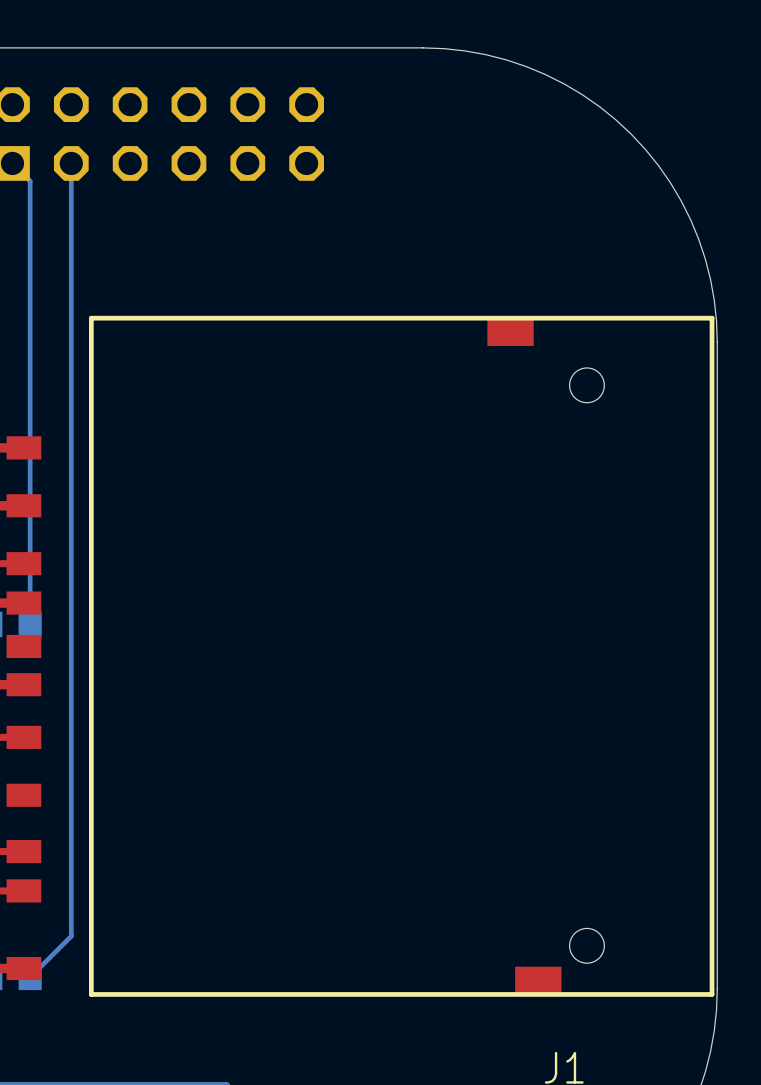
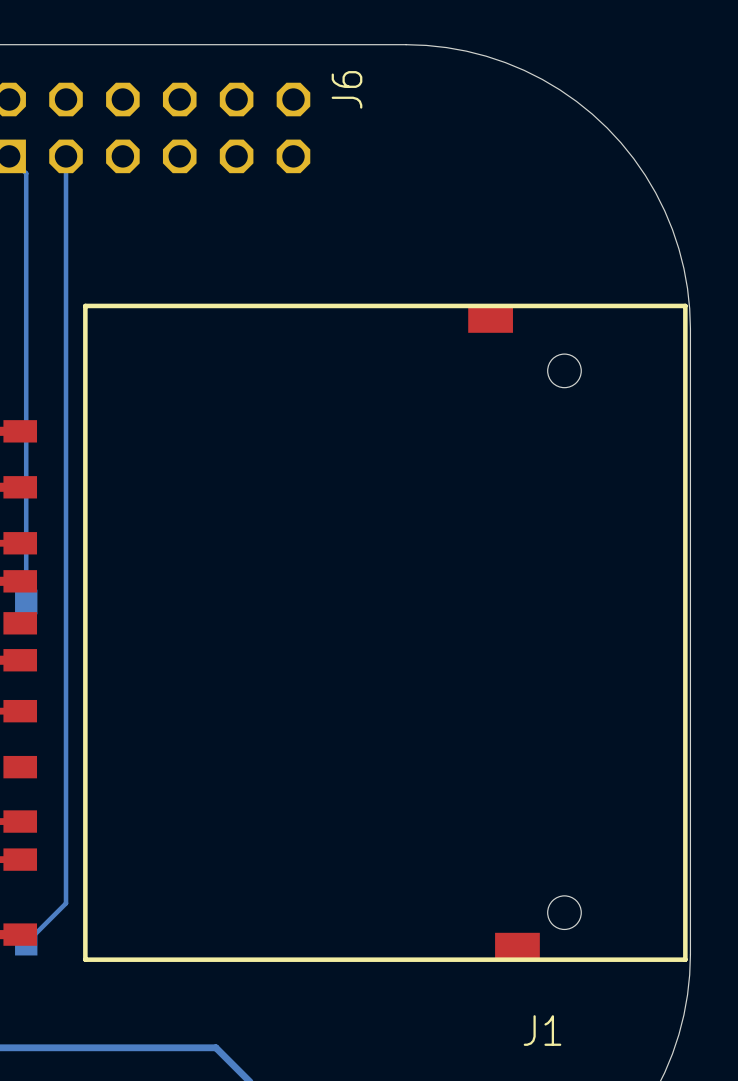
J6 name: none -> J6 (347, 89)

